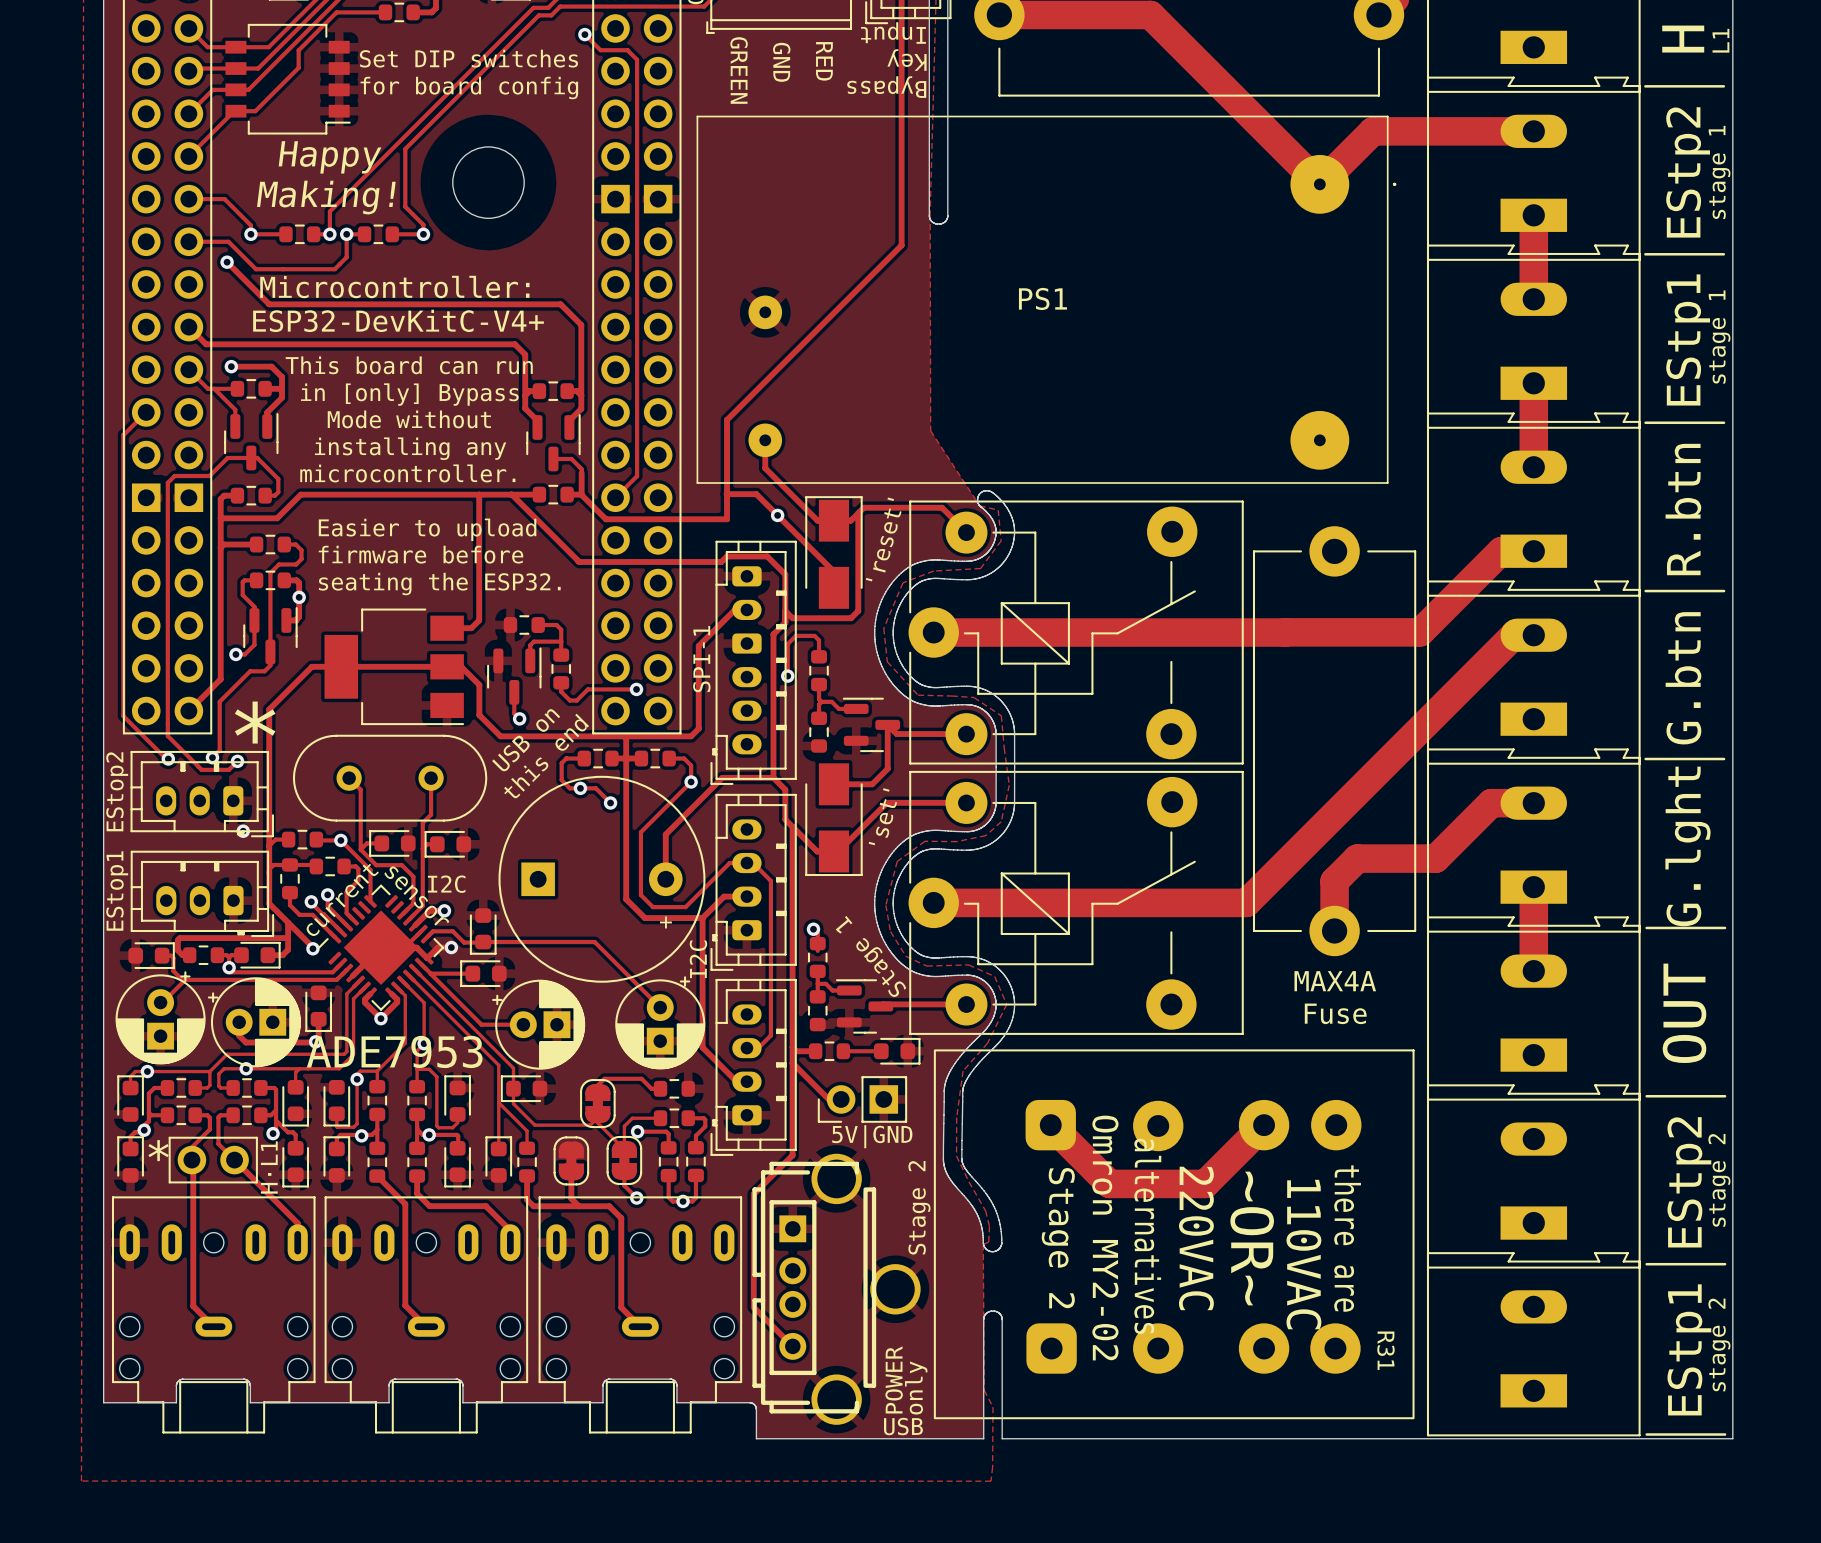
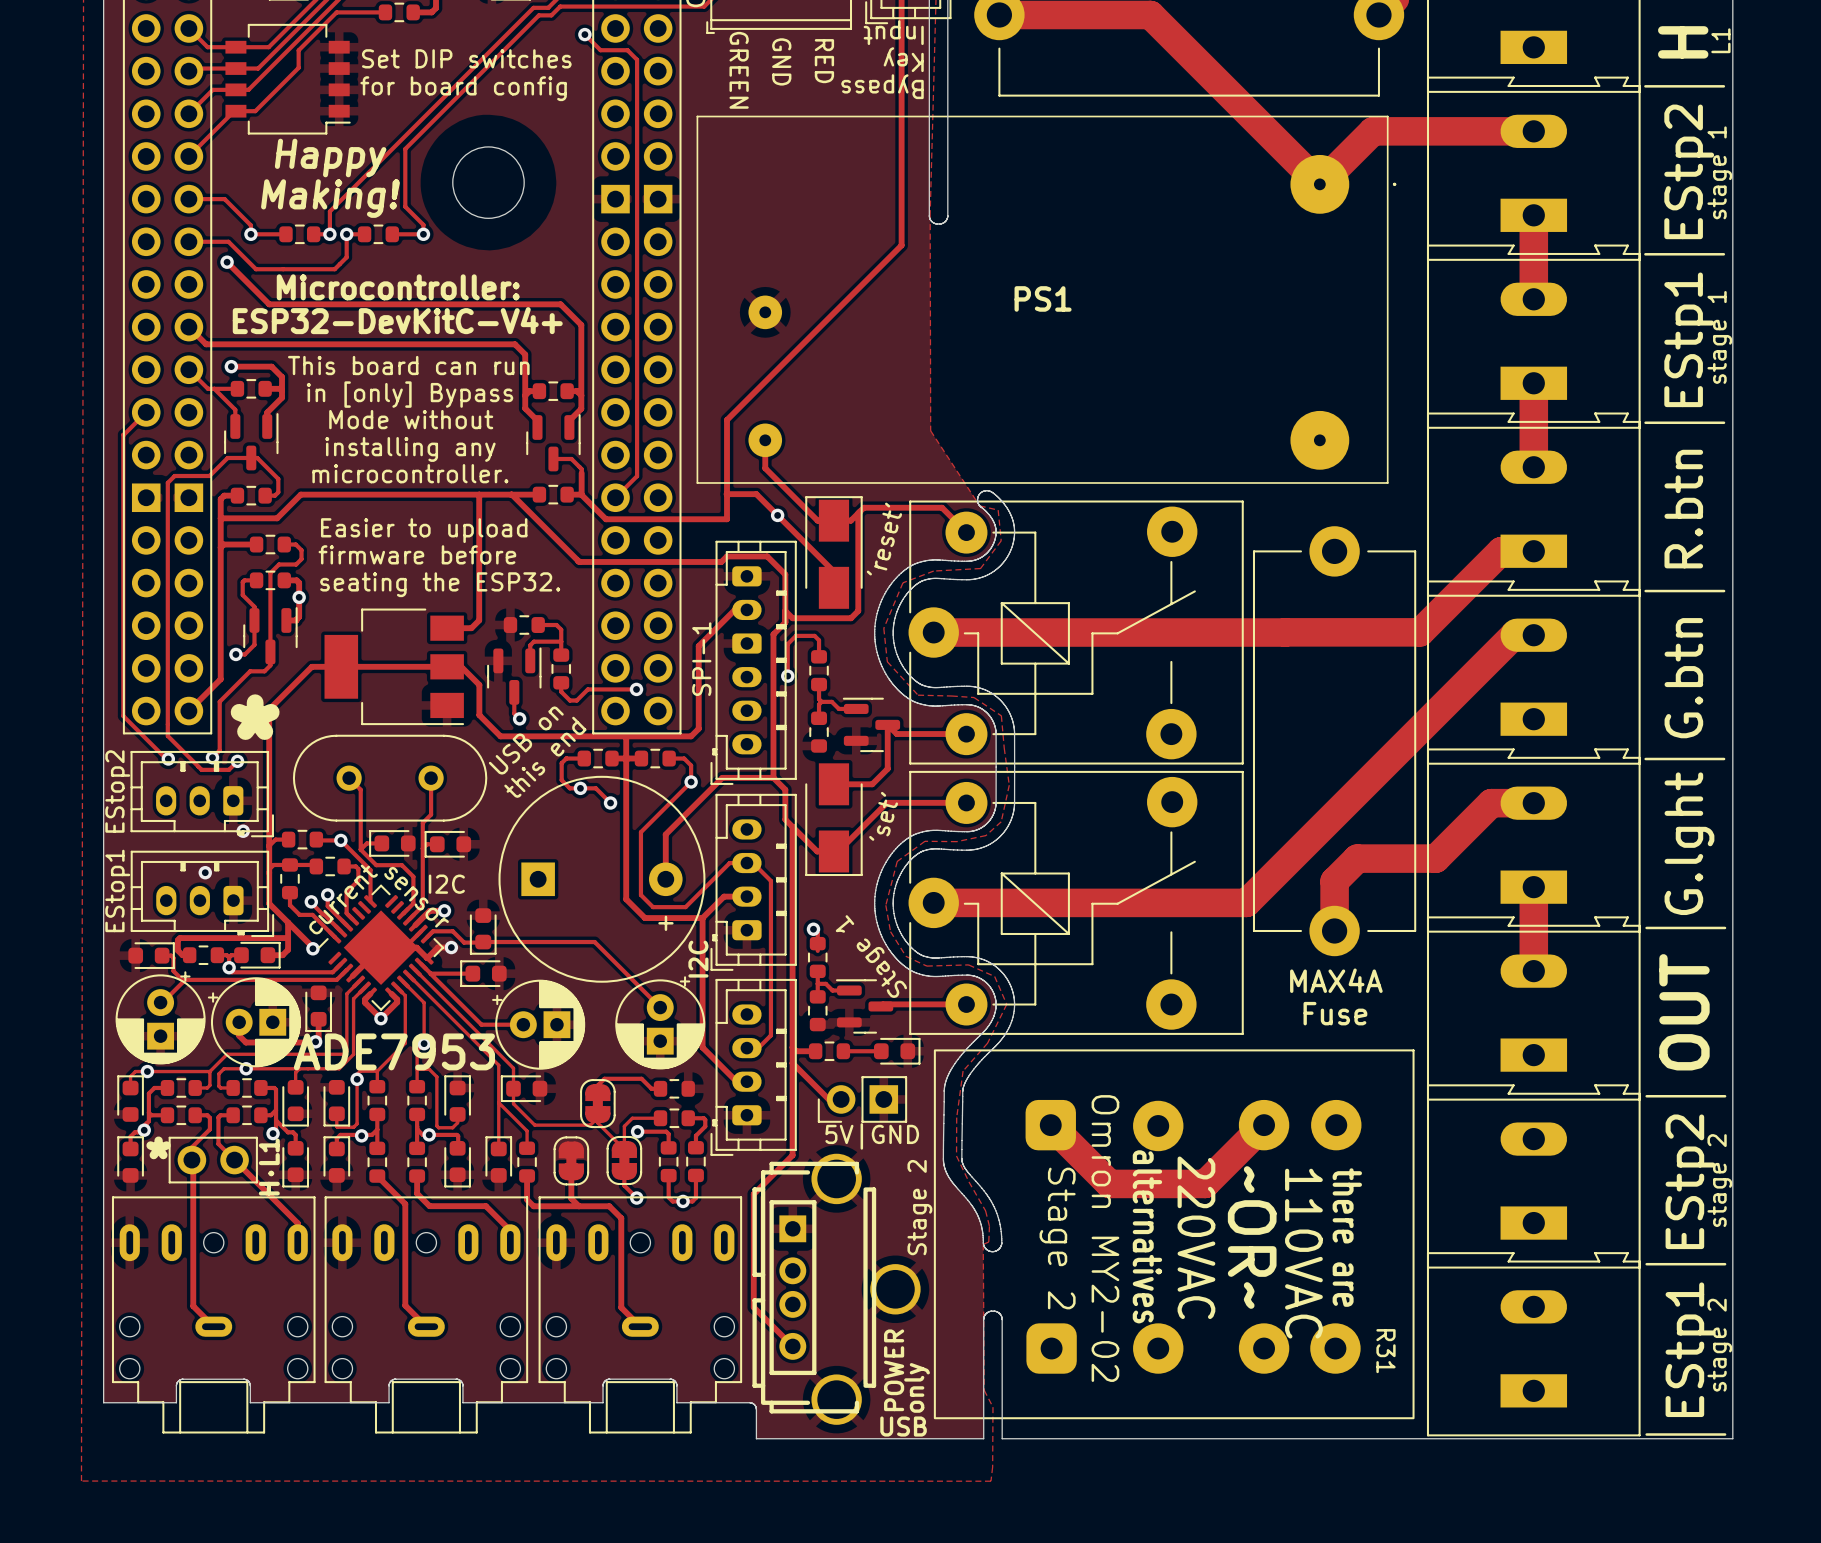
via: none -> (205, 872)

